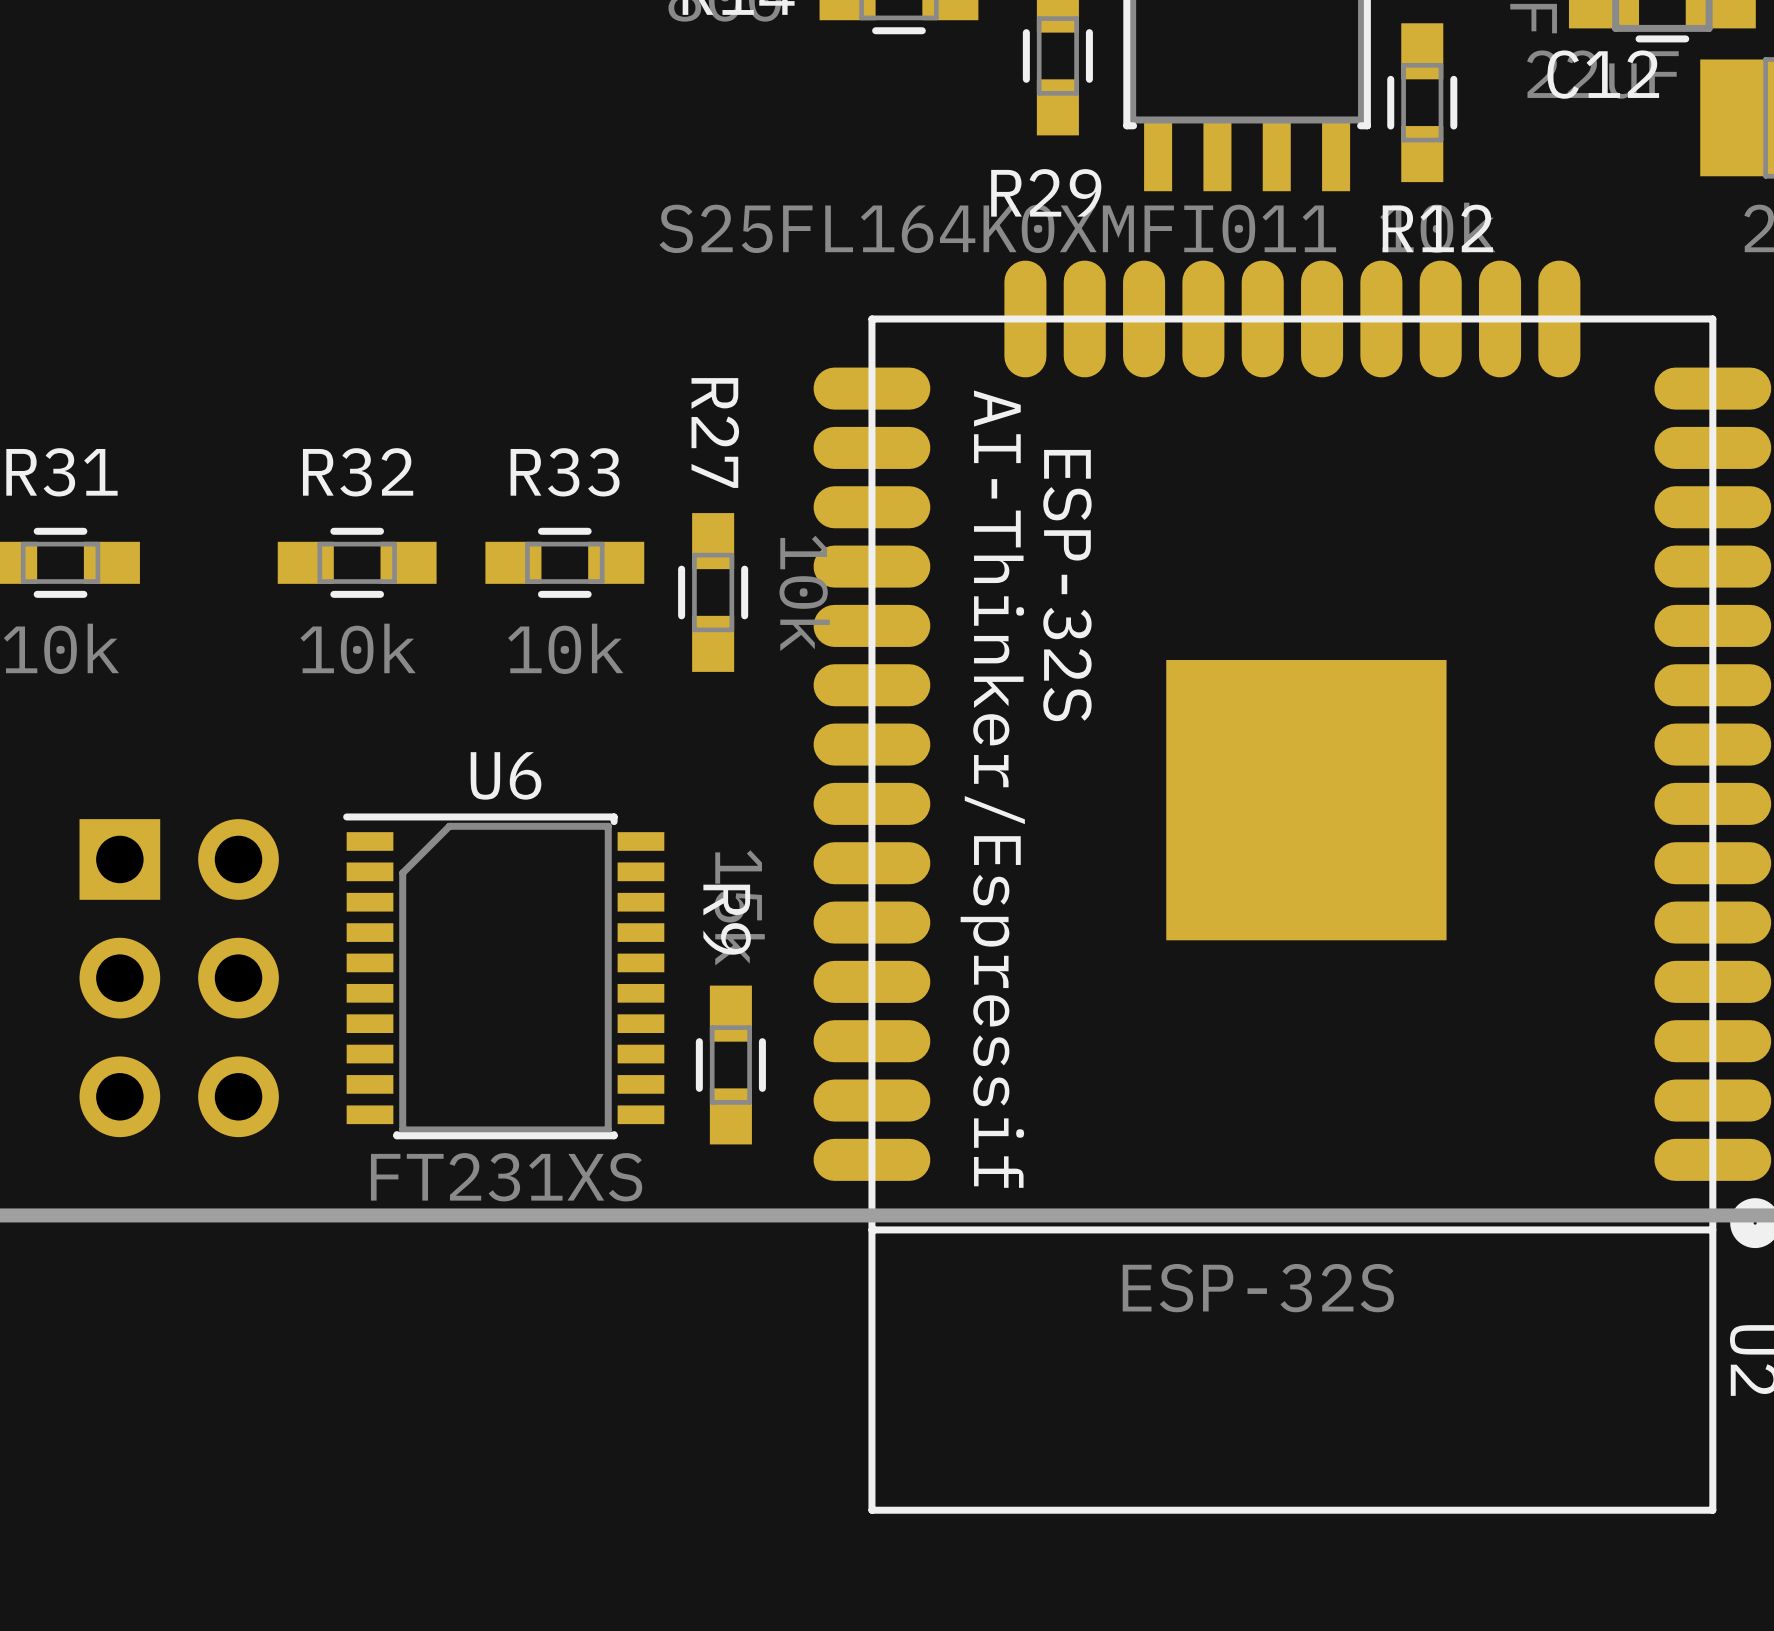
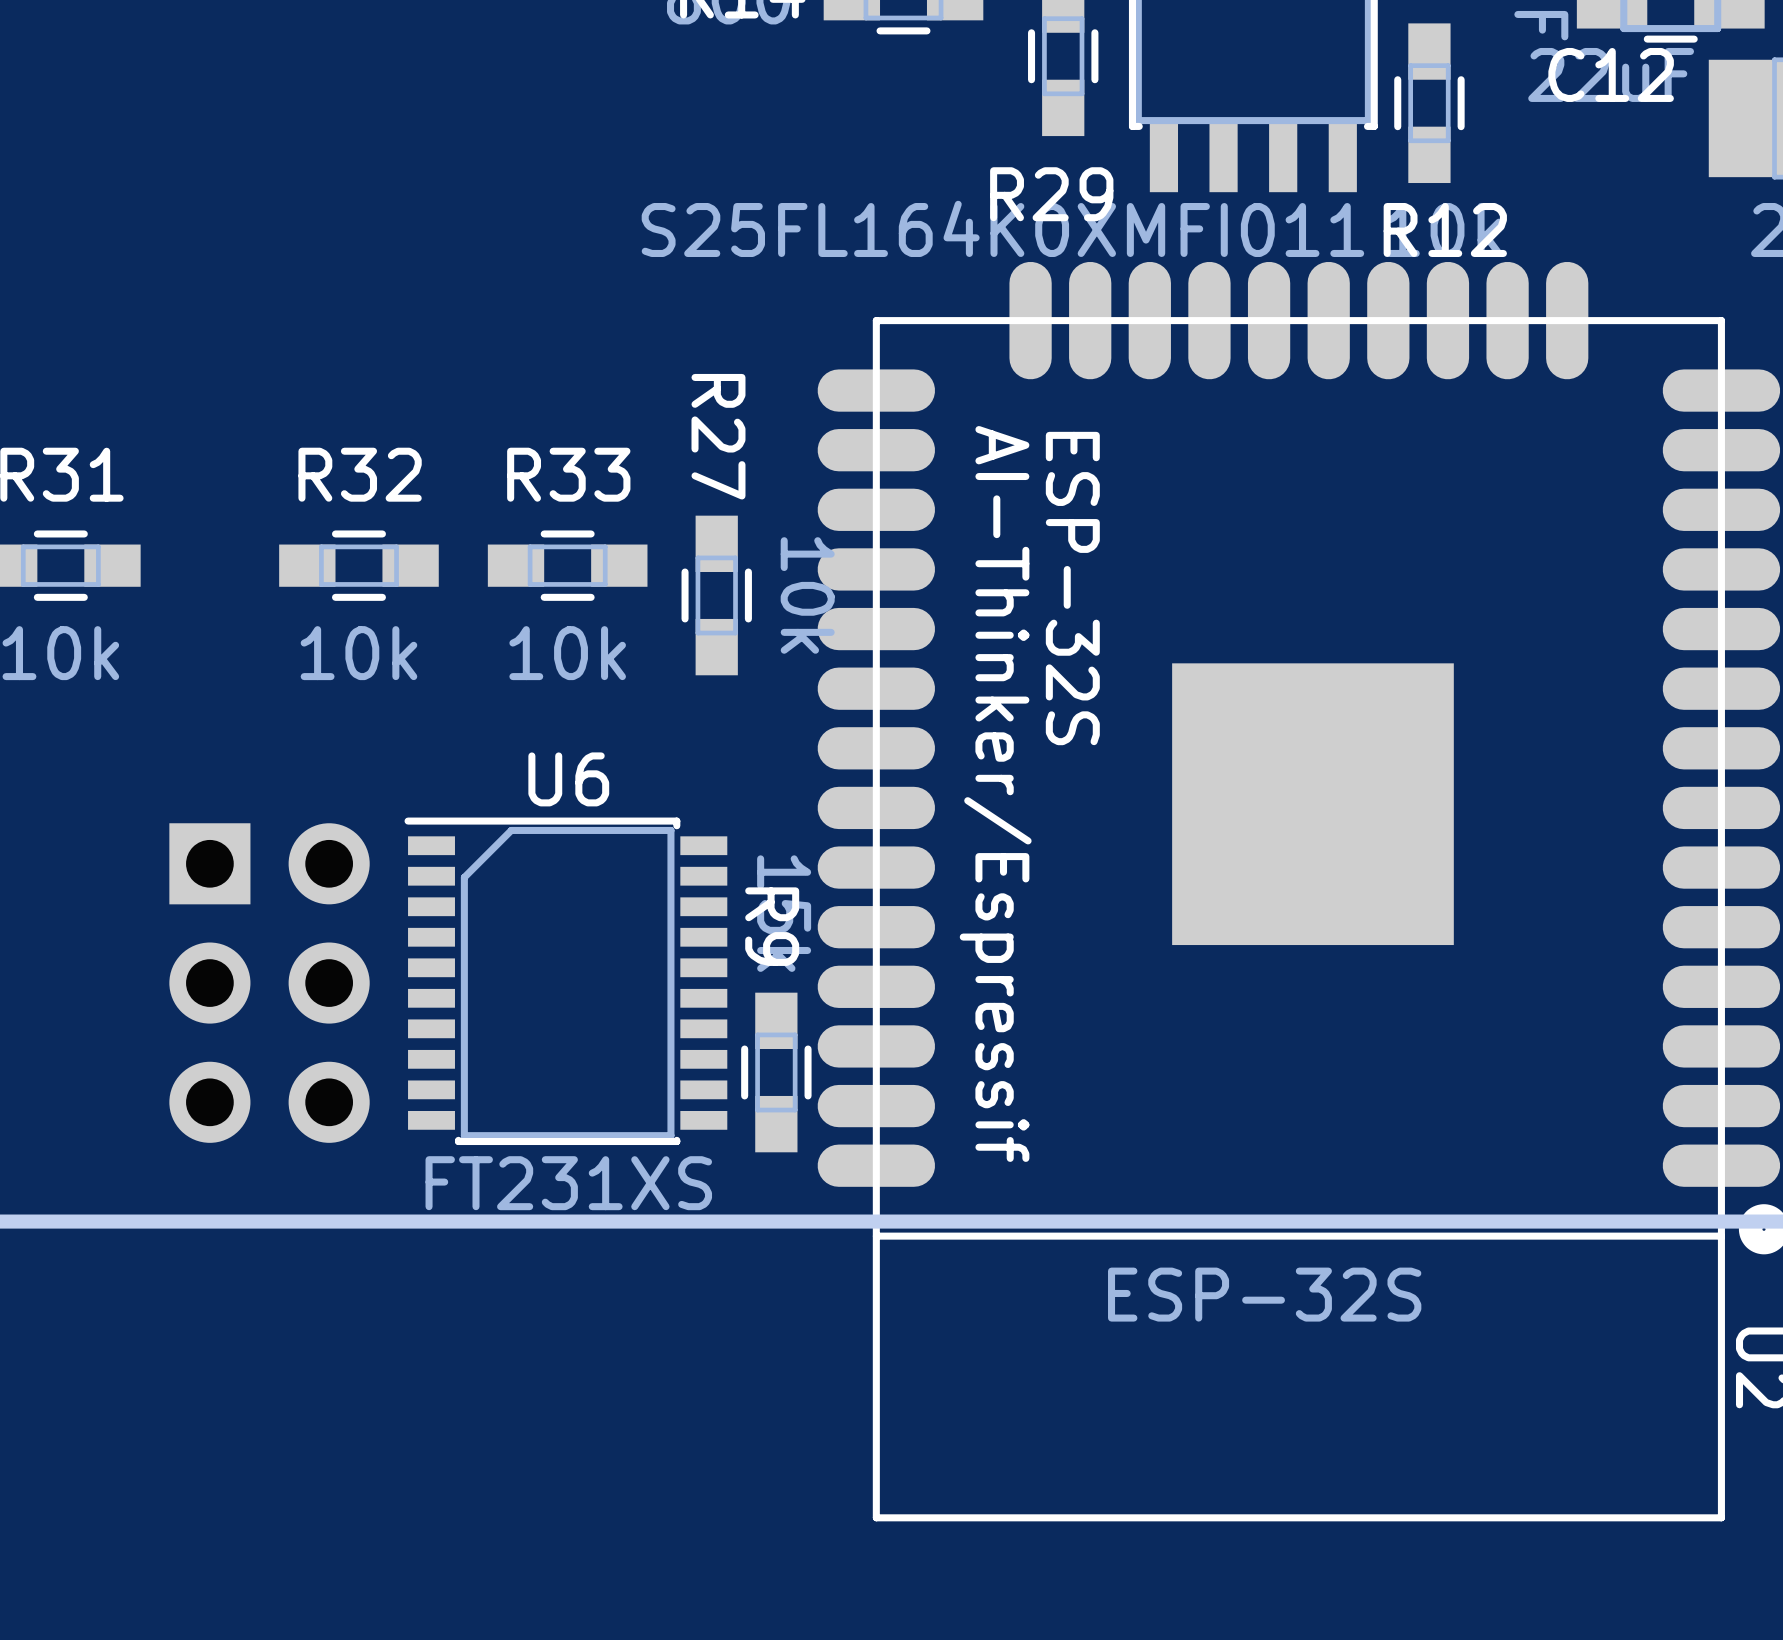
U6 position: (503, 976) -> (565, 981)
part position: (179, 978) -> (269, 983)
R9 position: (730, 1065) -> (776, 1072)

